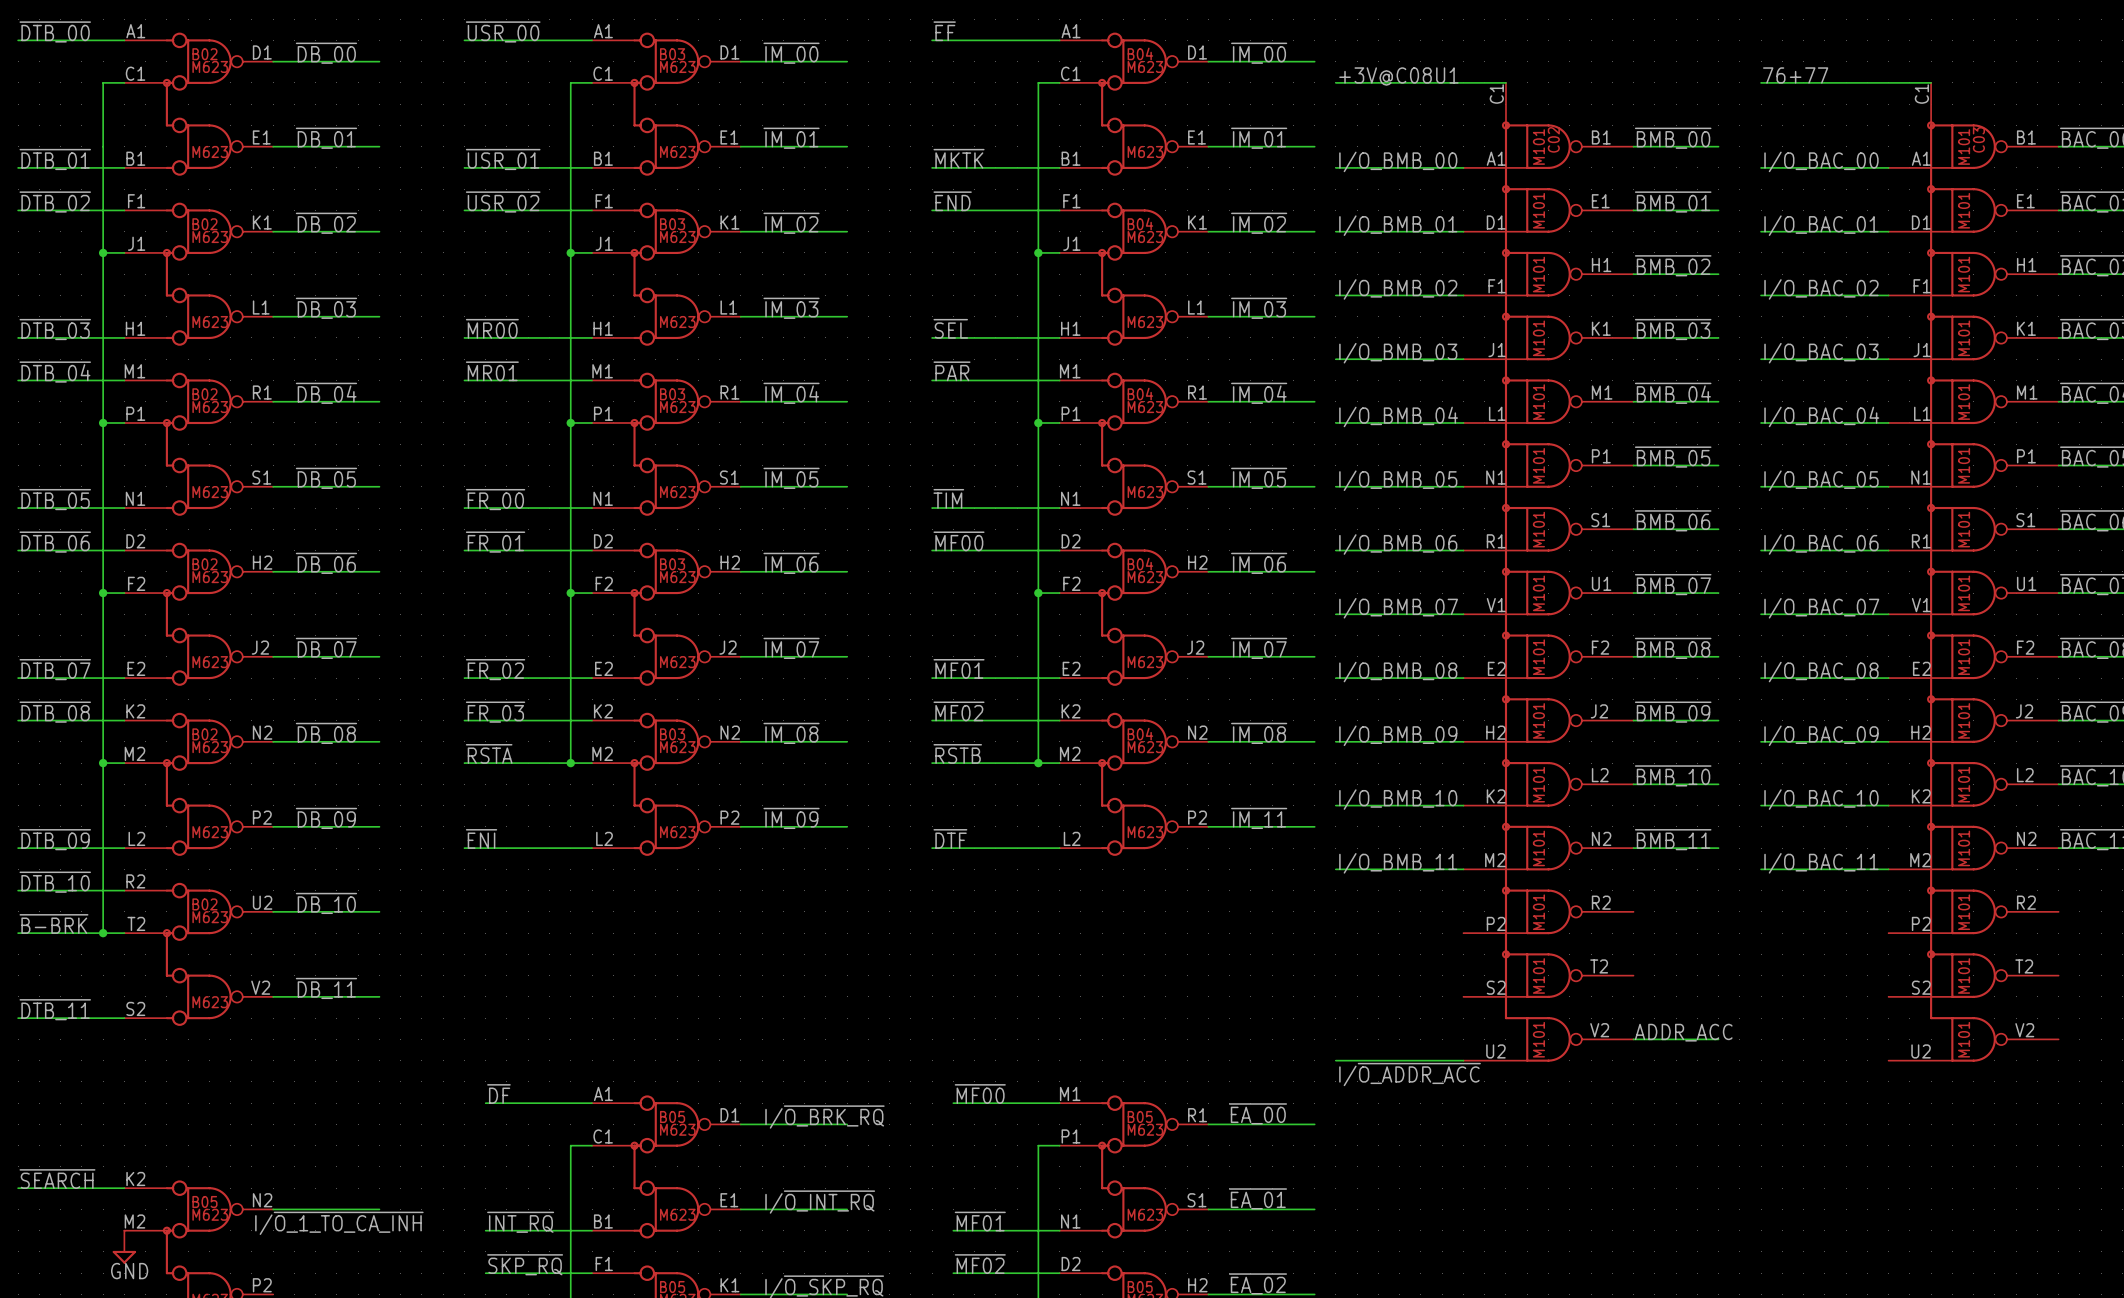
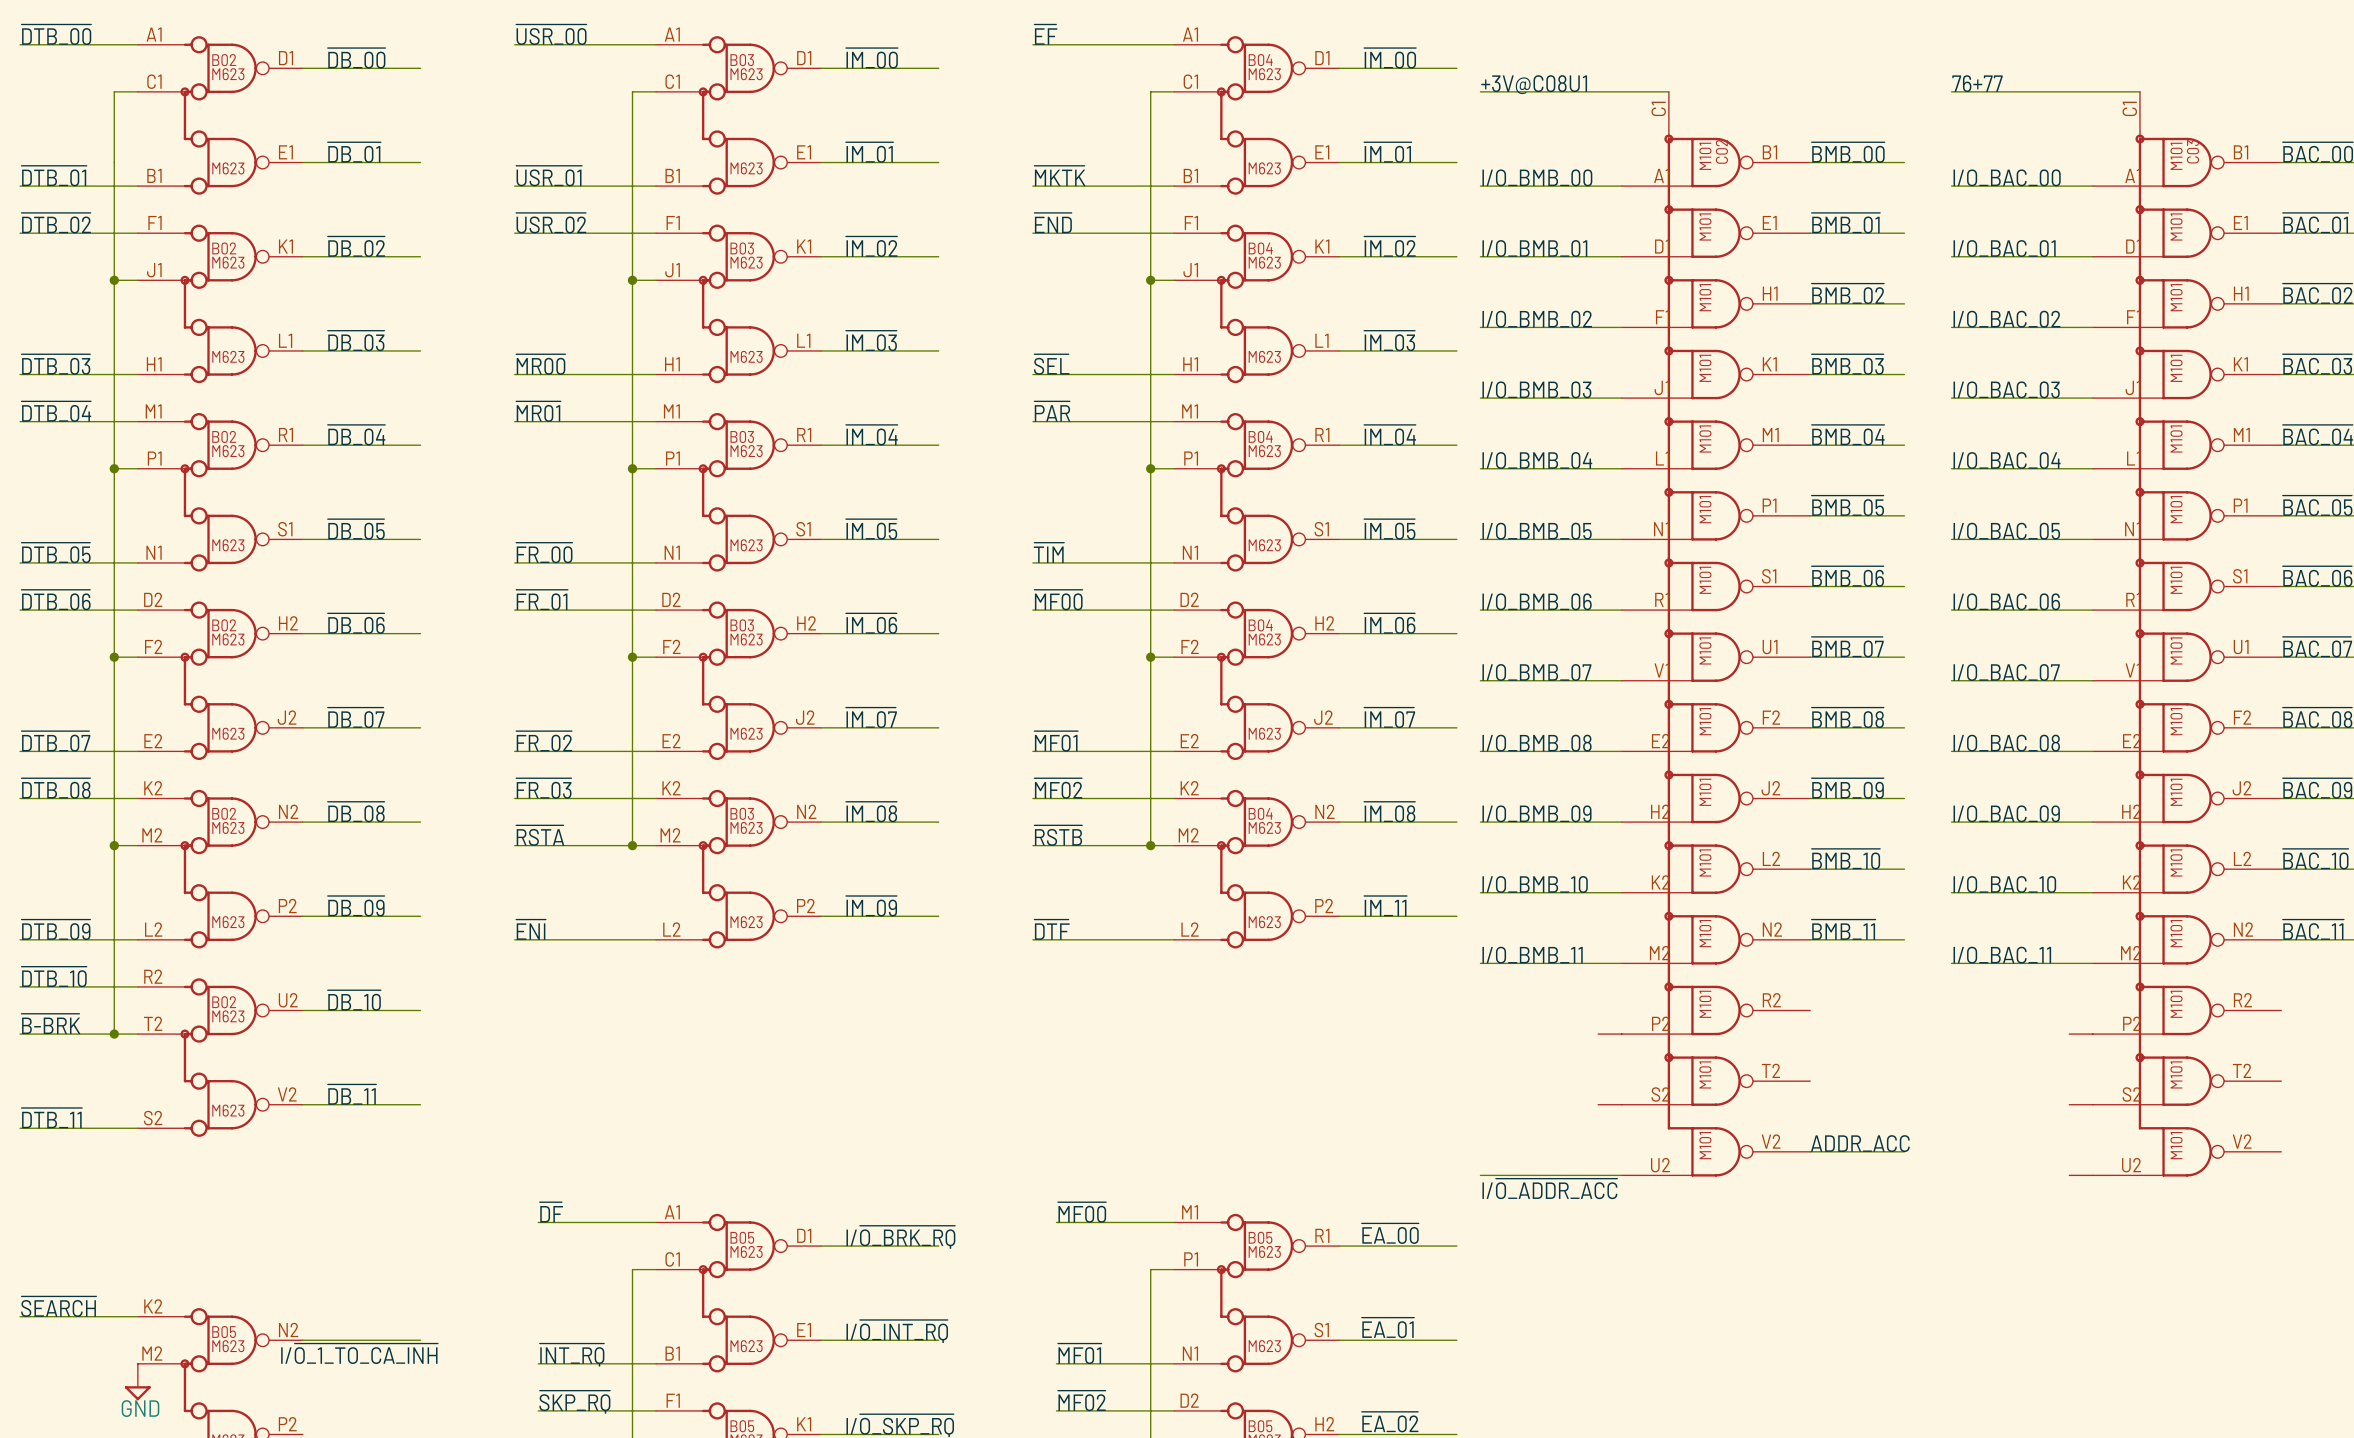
power symbol: none -> (1610, 1034)
power symbol: none -> (2081, 1034)
power symbol: none -> (1610, 1104)
power symbol: none -> (2081, 1104)
power symbol: none -> (2081, 1175)

